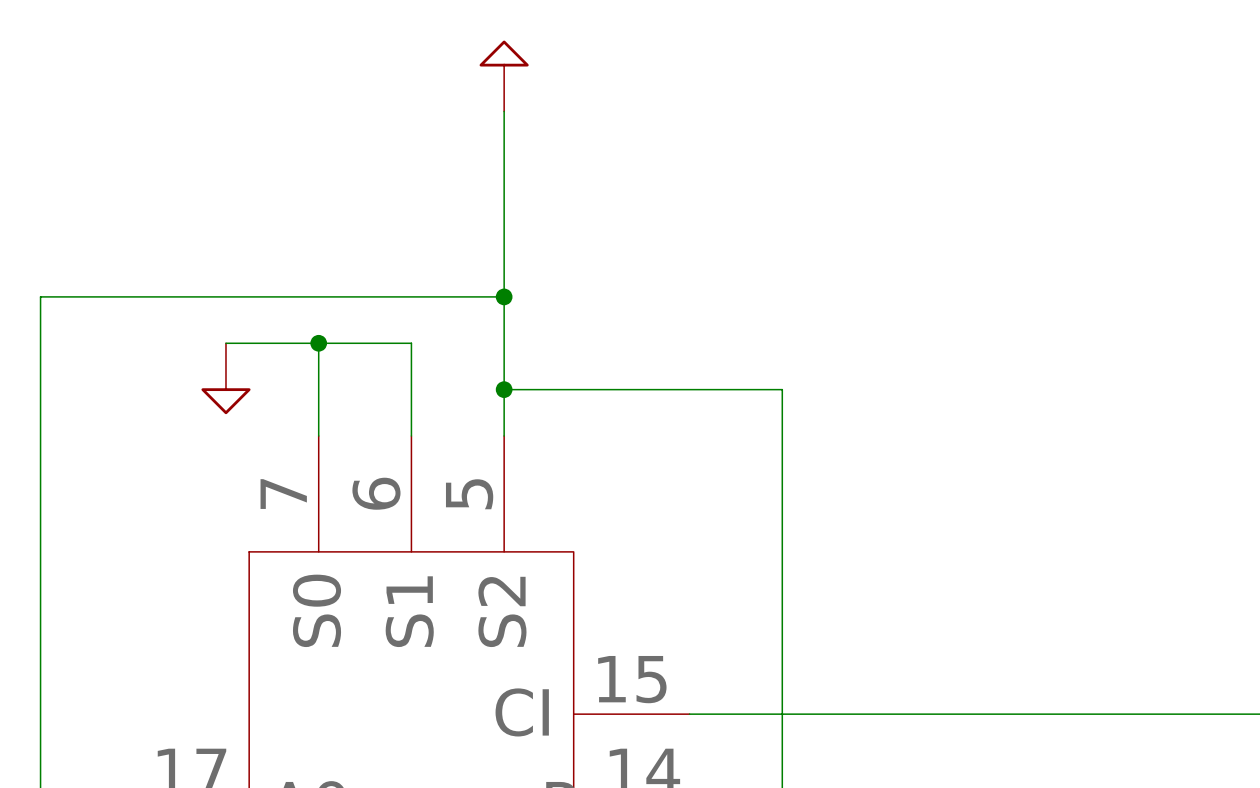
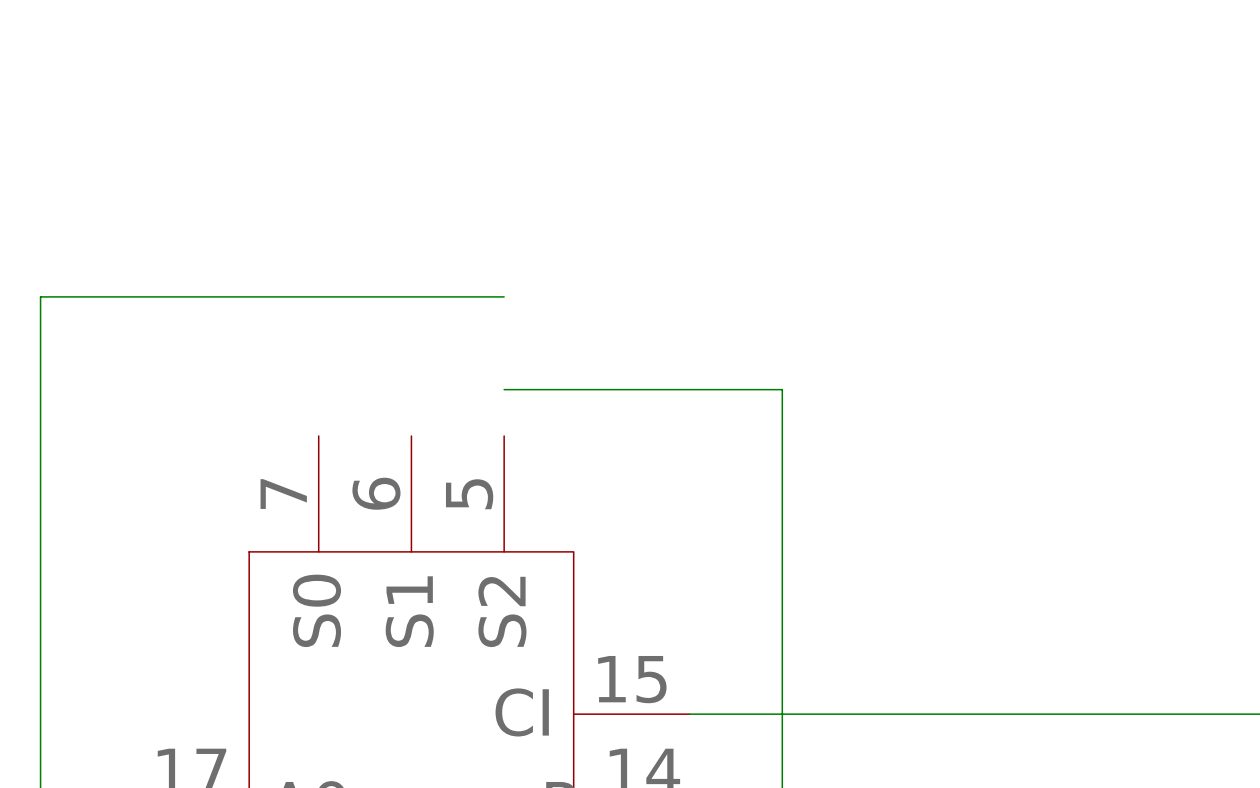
power symbol: (504, 76) -> none
wire: (504, 111) (504, 435) -> none
junction: (504, 296) -> none
wire: (225, 343) (411, 343) (411, 435) -> none
wire: (318, 343) (318, 435) -> none
junction: (318, 343) -> none
power symbol: (225, 378) -> none
junction: (504, 389) -> none

